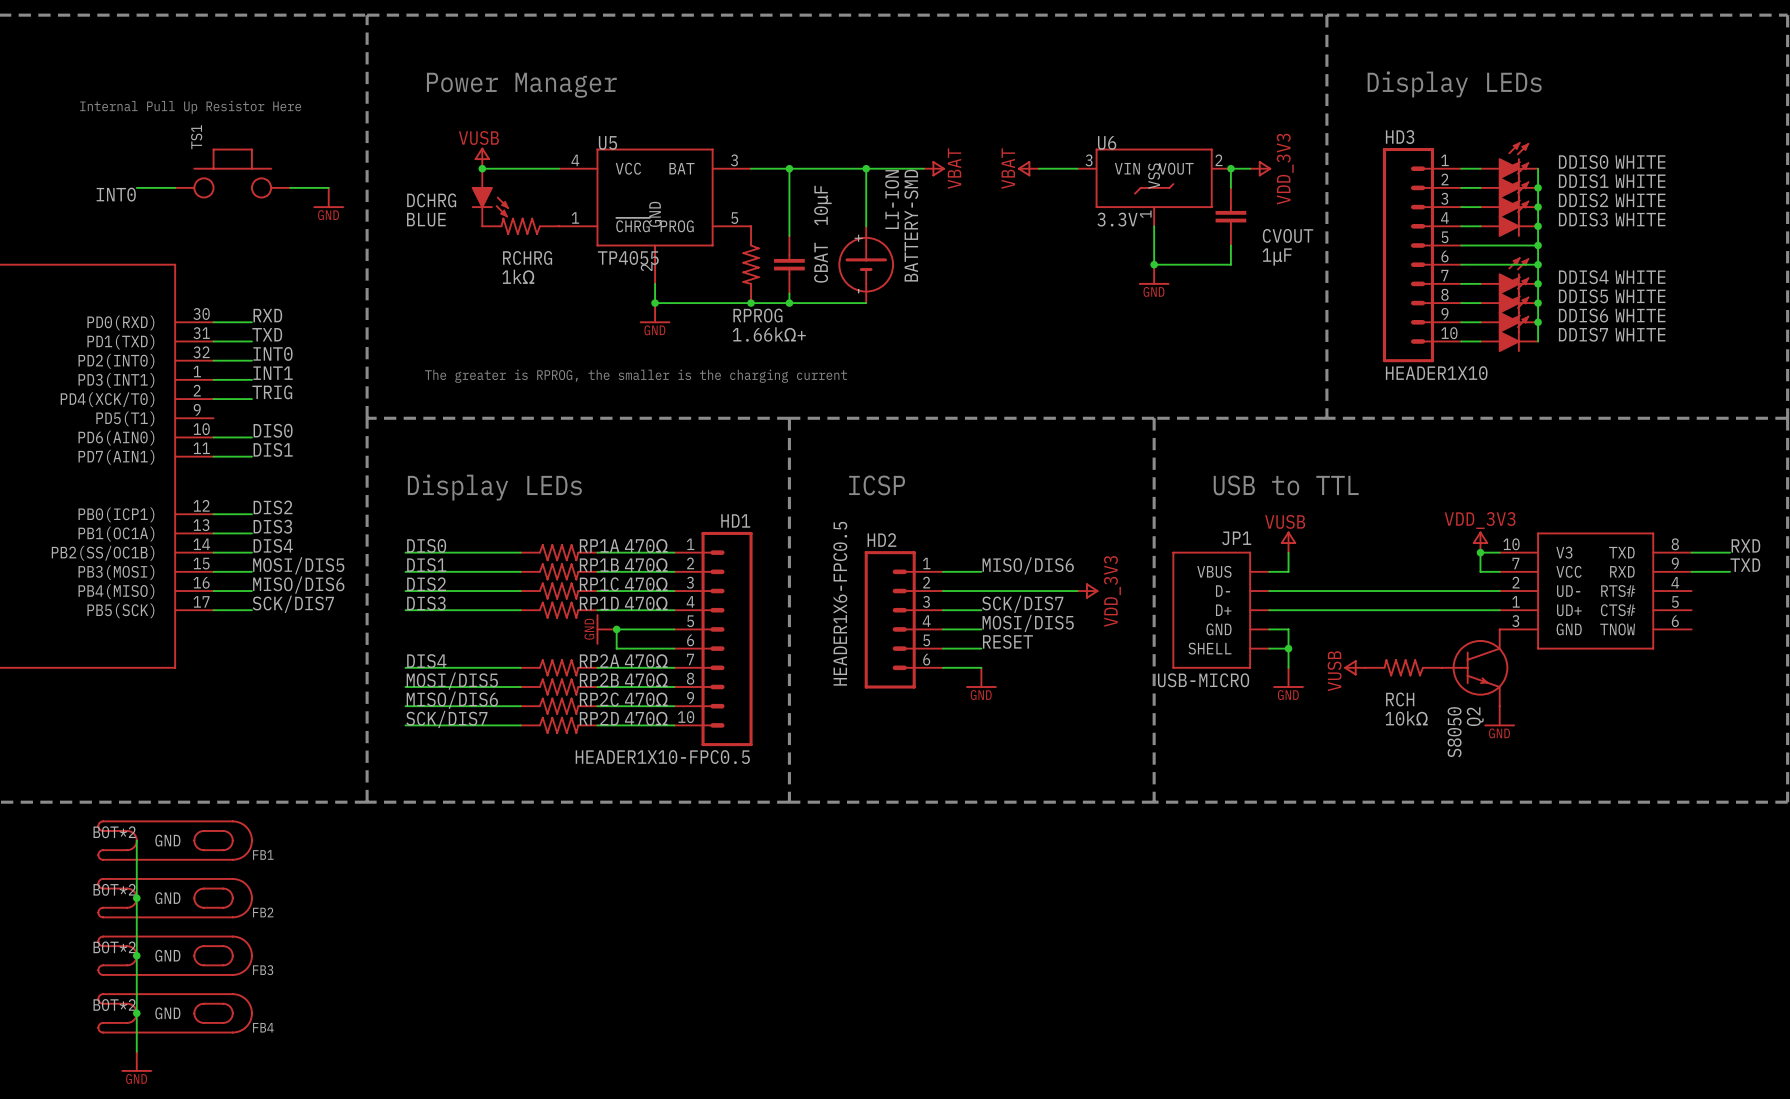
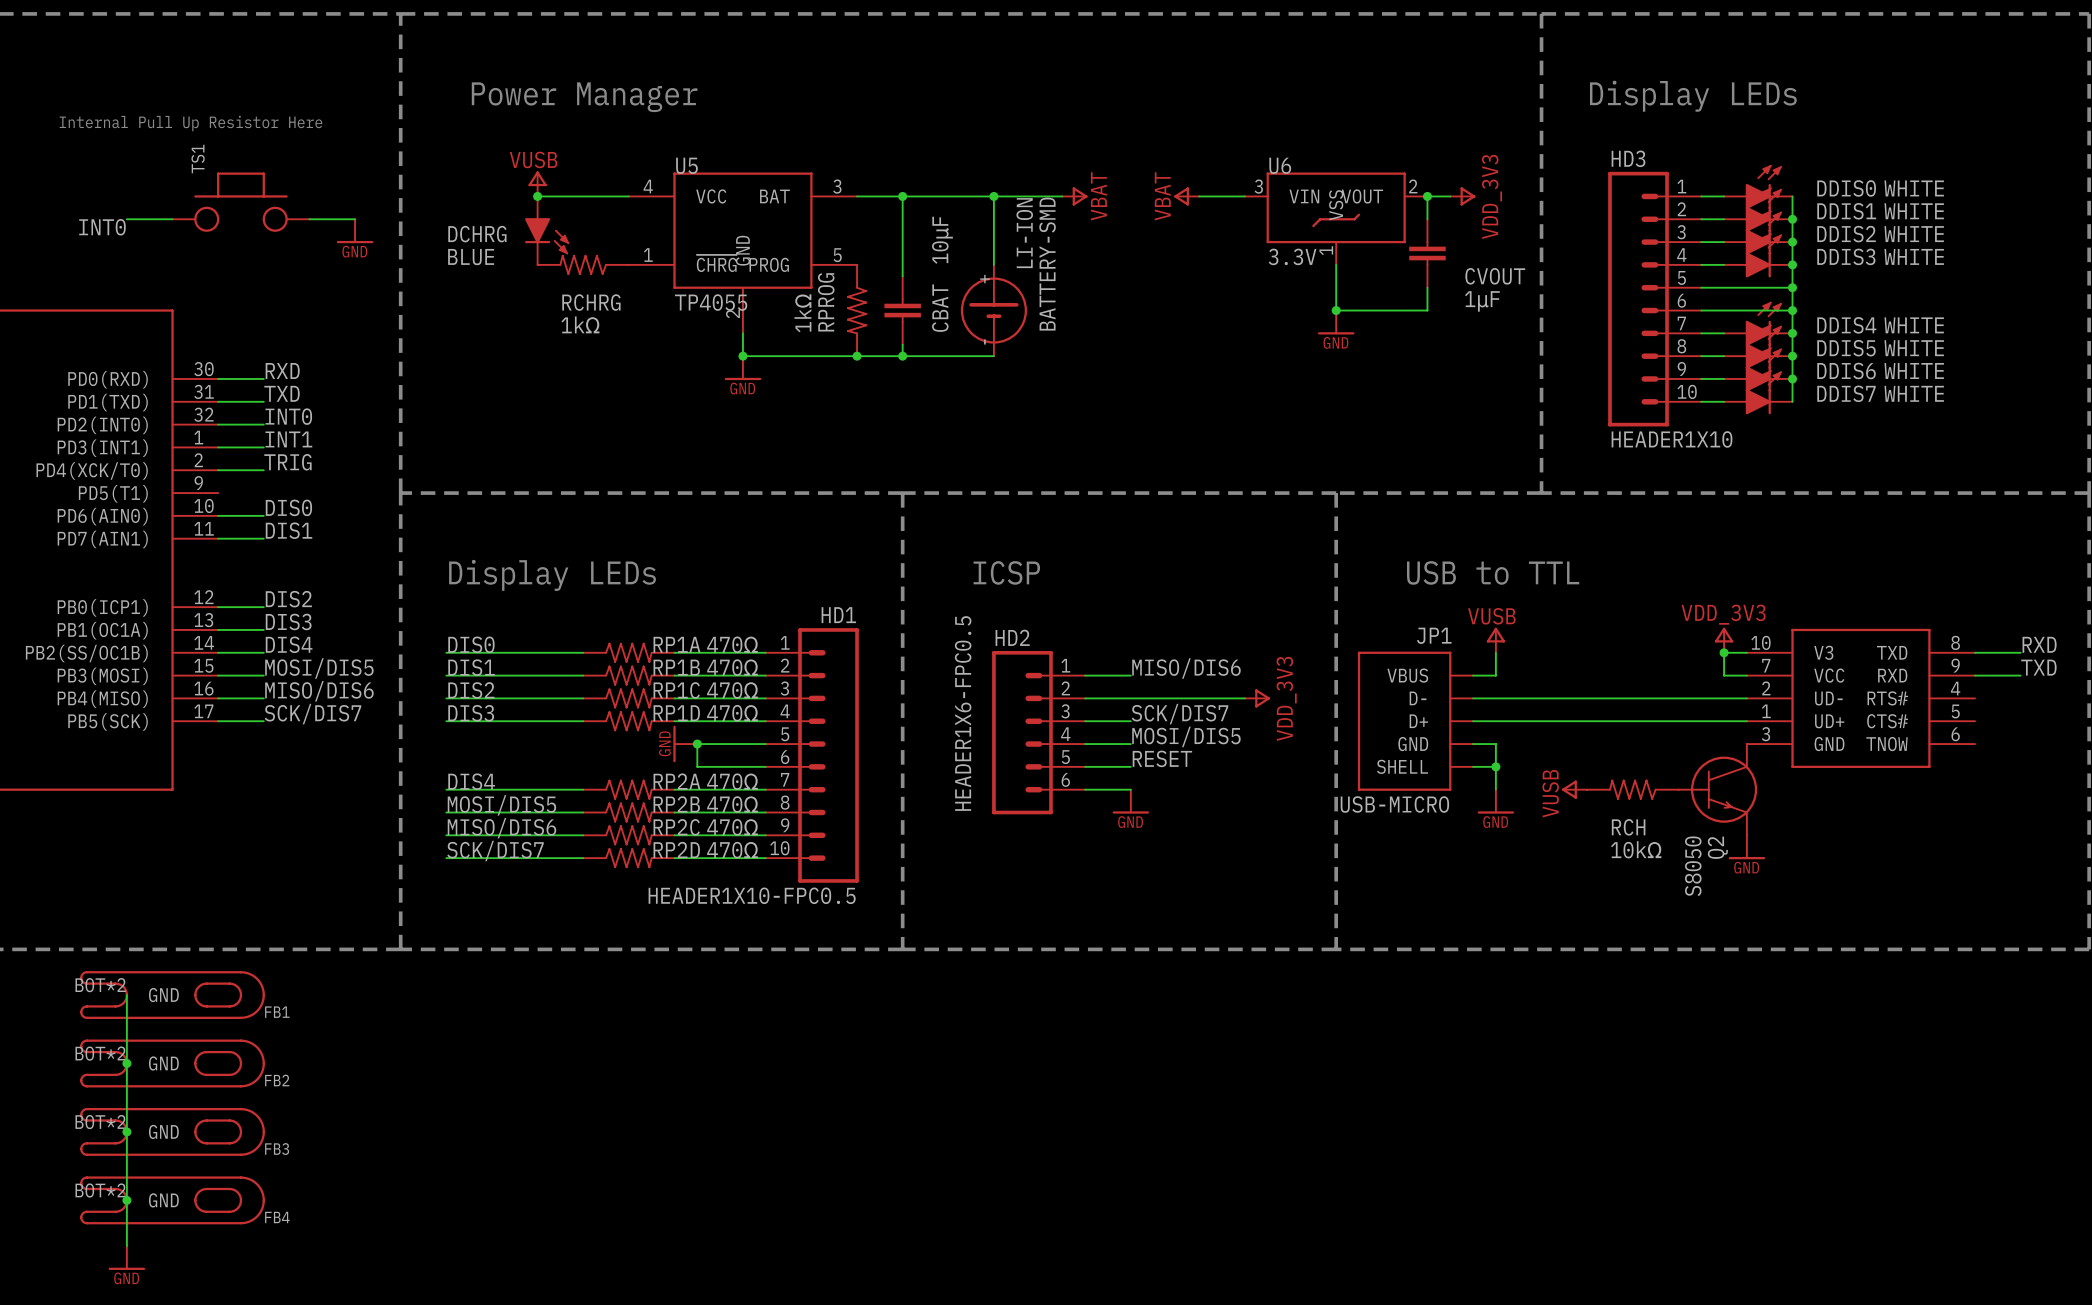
RPROG name rotation: 0° (757, 315) -> 90° counterclockwise (826, 302)
RPROG name position: RPROG (757, 315) -> RPROG (826, 302)
RPROG value: 1.66kΩ+ (769, 334) -> 1kΩ (802, 313)
text: The greater is RPROG, the smaller is the charging current (636, 376) -> none

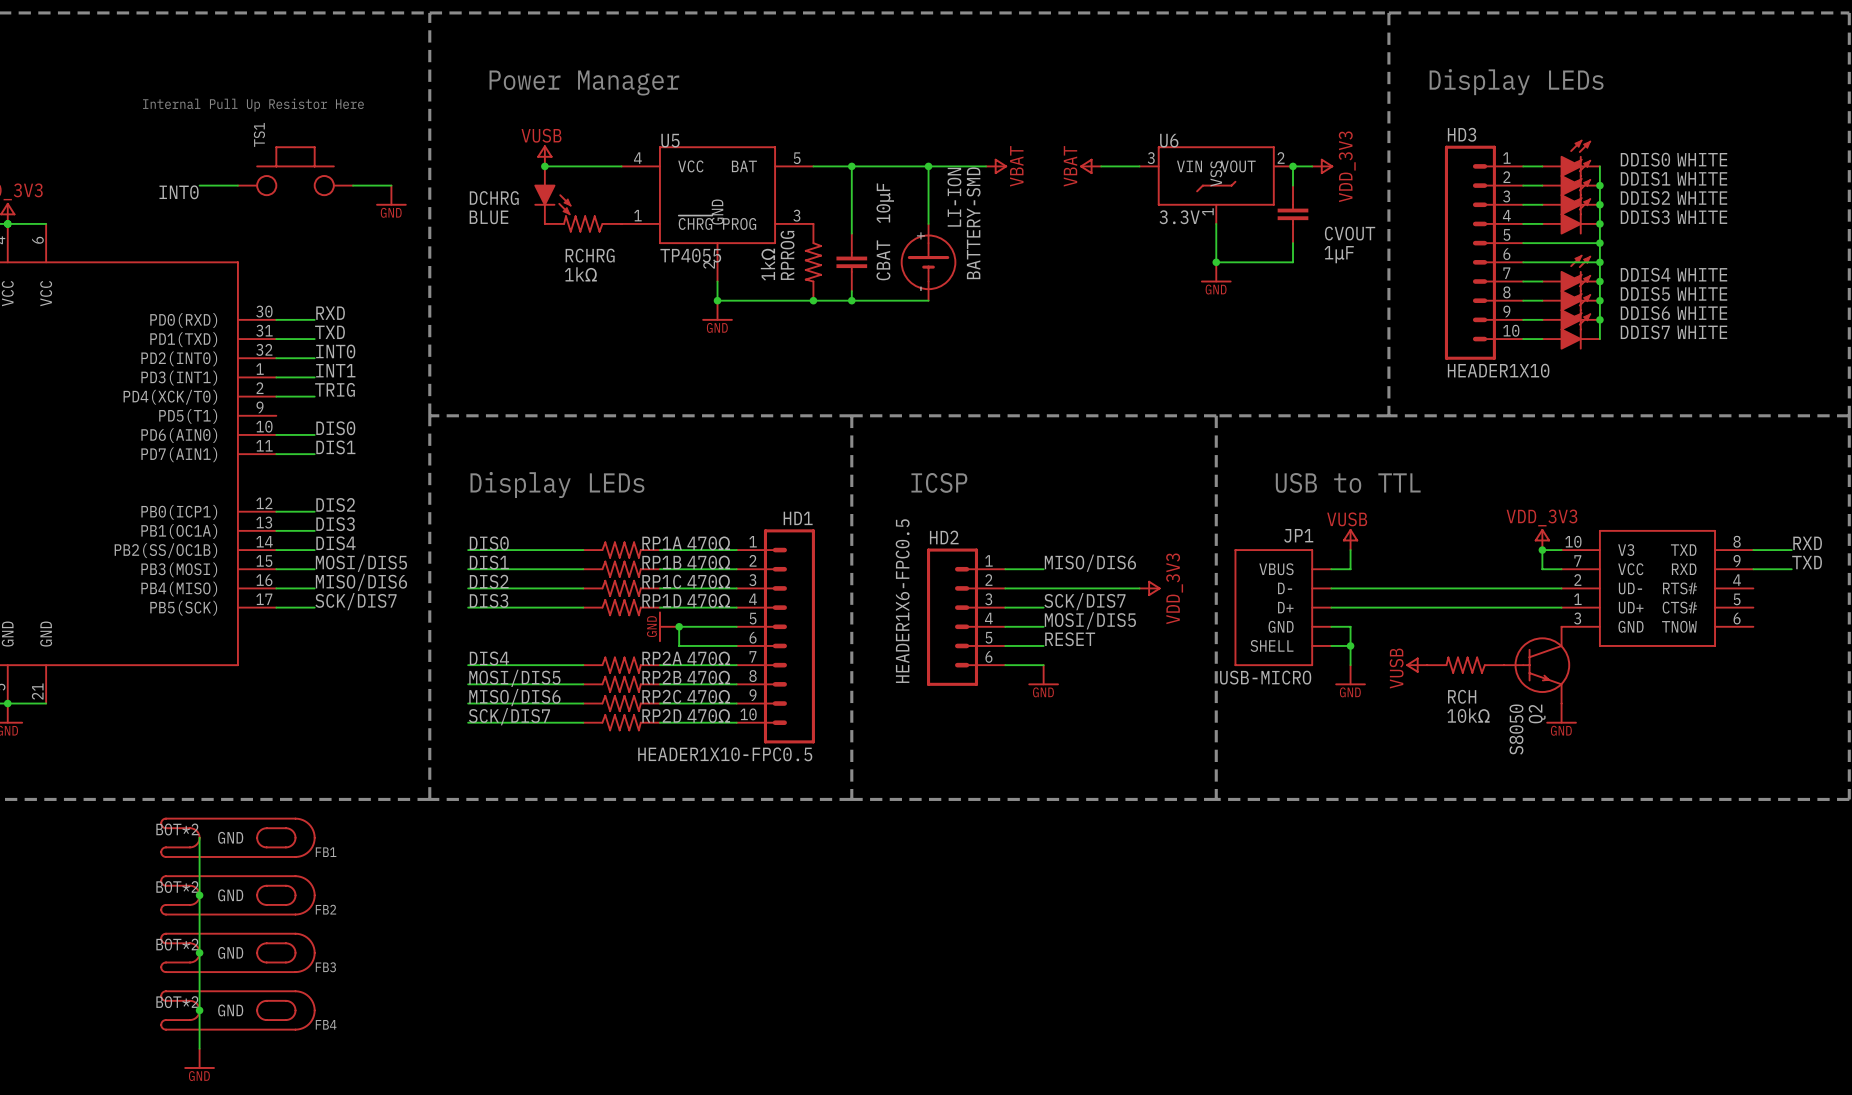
U5 pin number: 3 (837, 186) -> 5 (797, 158)
U5 pin number: 5 (837, 255) -> 3 (796, 215)

